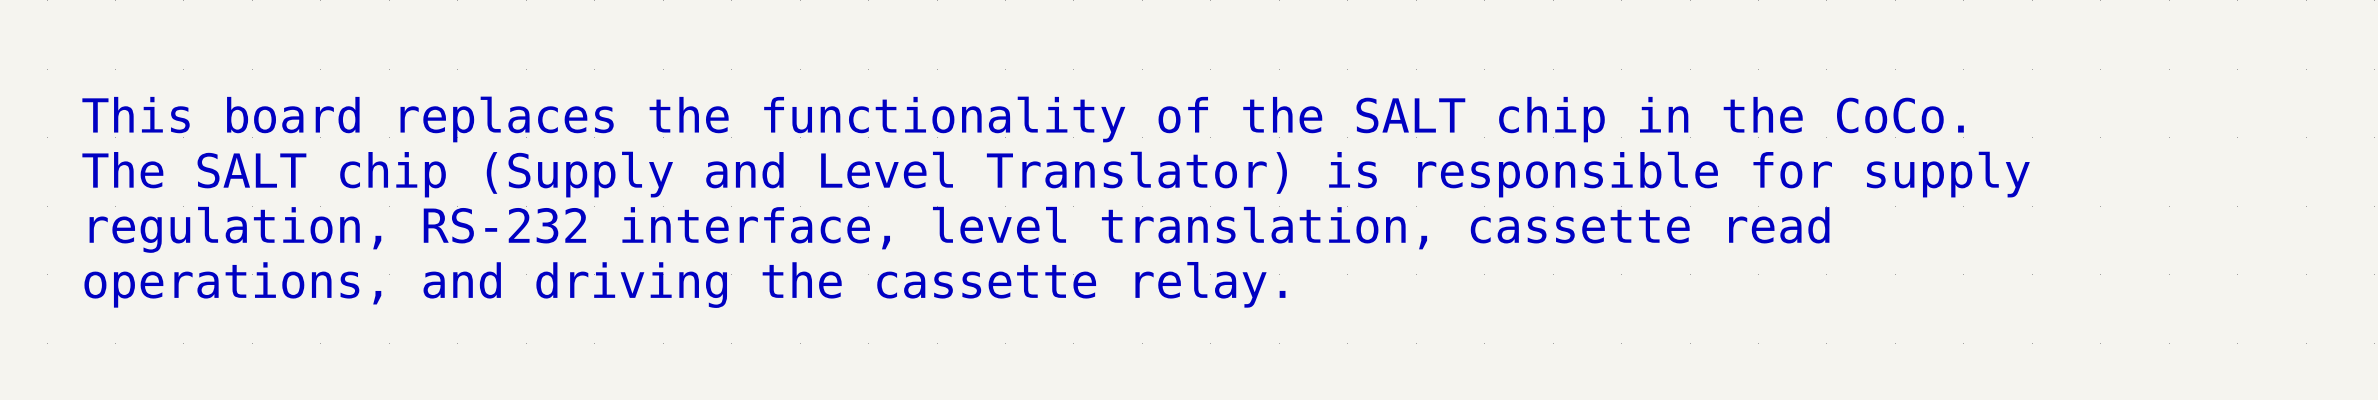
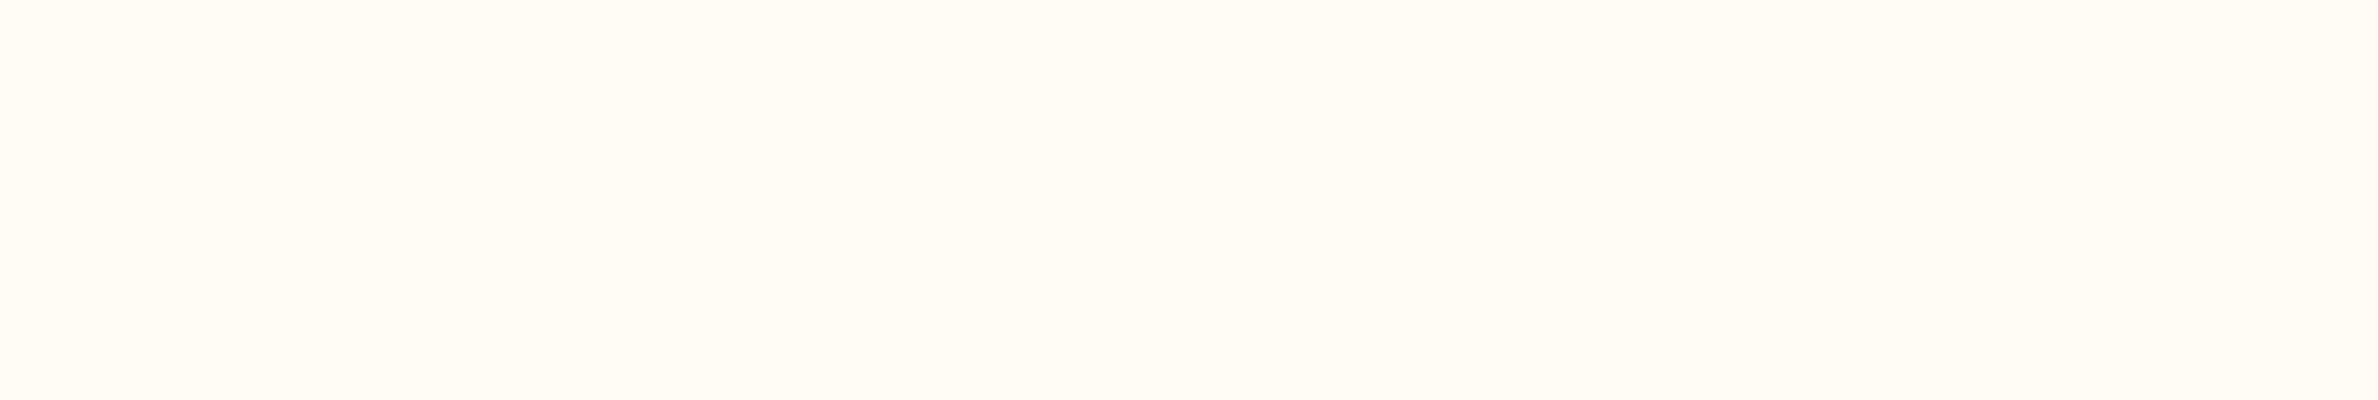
text: This board replaces the functionality of the SALT chip in the CoCo. (1023, 119) -> none
text: The SALT chip (Supply and Level Translator) is responsible for supply (1056, 174) -> none
text: regulation, RS-232 interface, level translation, cassette read (959, 229) -> none
text: operations, and driving the cassette relay. (684, 284) -> none

